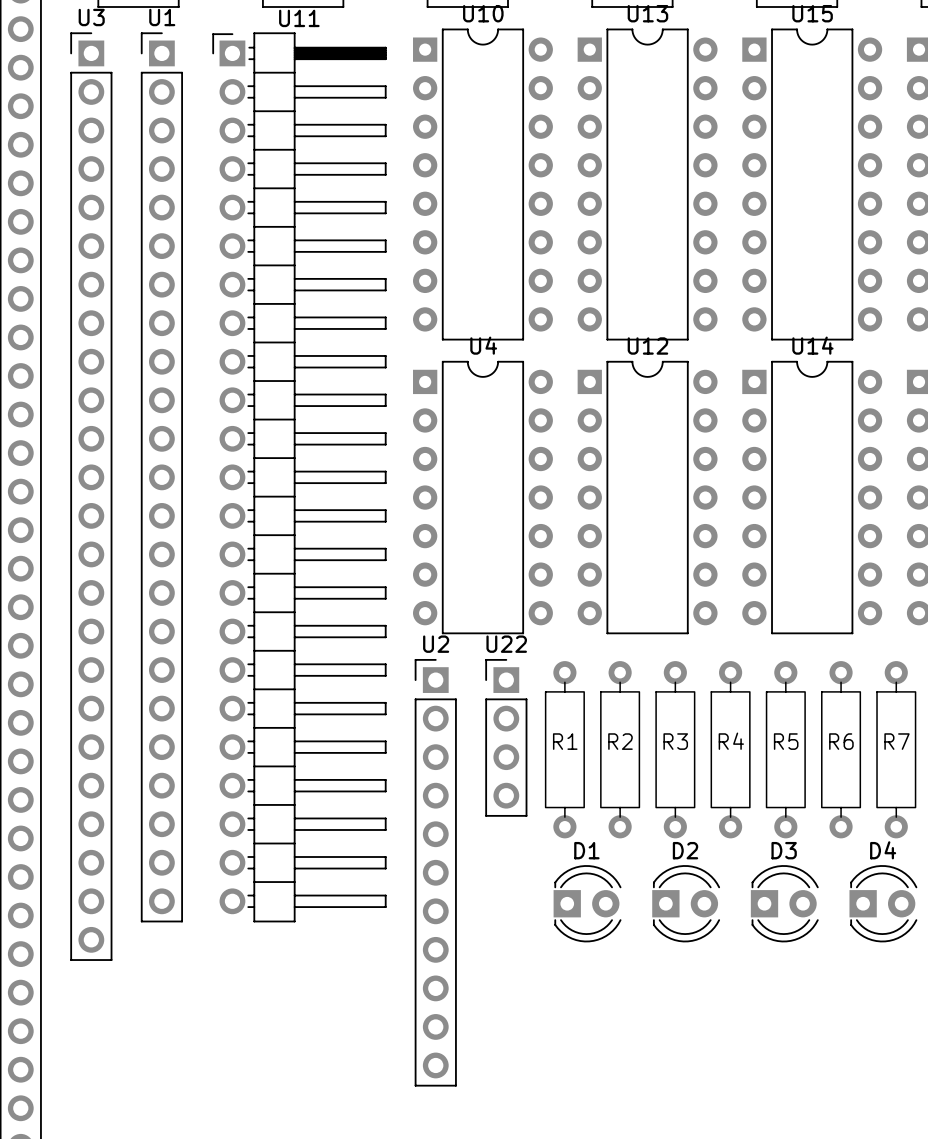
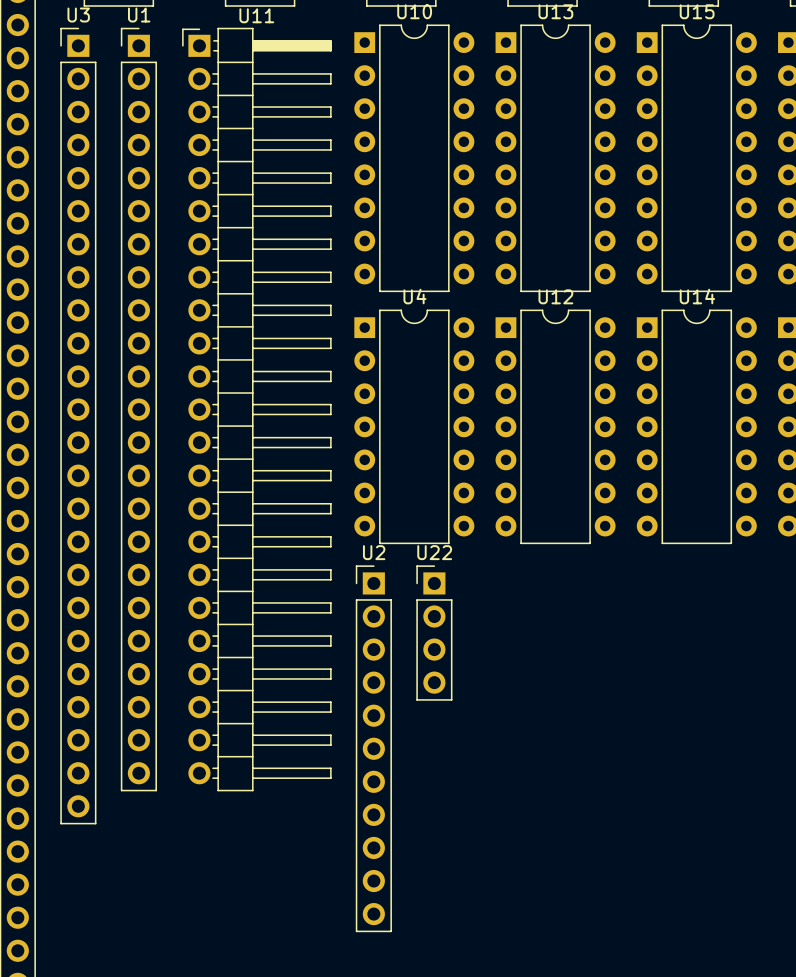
R1: (564, 749) -> none
R2: (620, 749) -> none
R3: (675, 749) -> none
R4: (730, 749) -> none
R5: (785, 749) -> none
R6: (841, 749) -> none
R7: (896, 749) -> none
D1: (587, 903) -> none
D2: (686, 903) -> none
D3: (784, 903) -> none
D4: (883, 903) -> none

